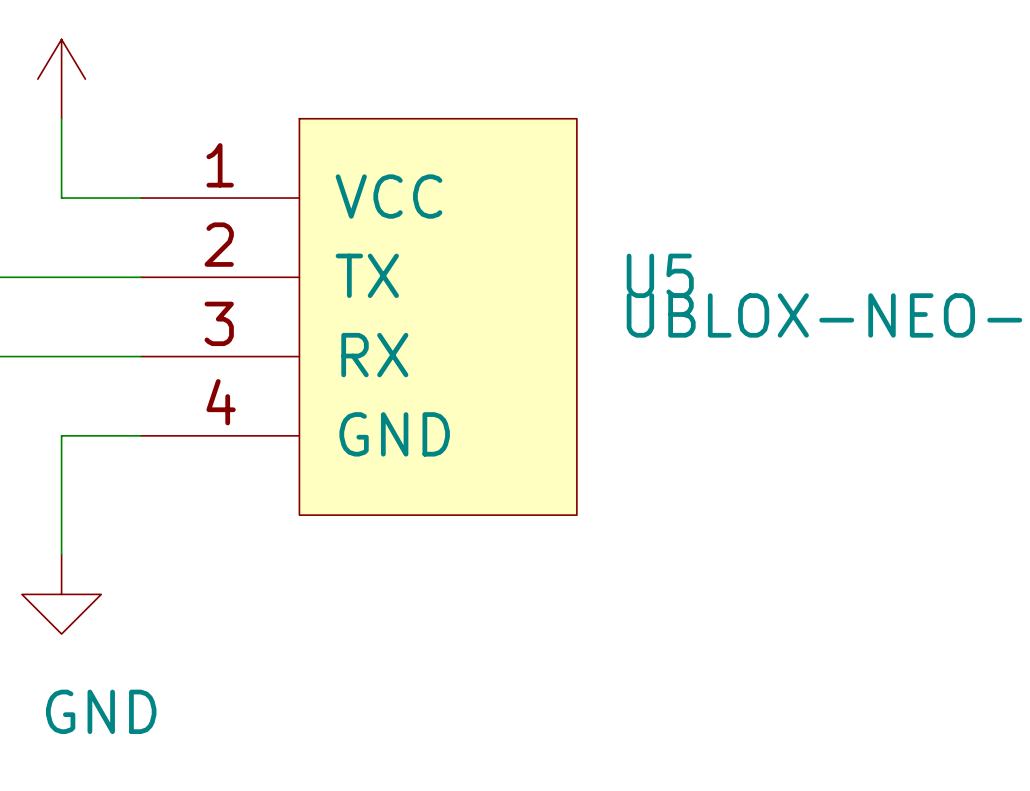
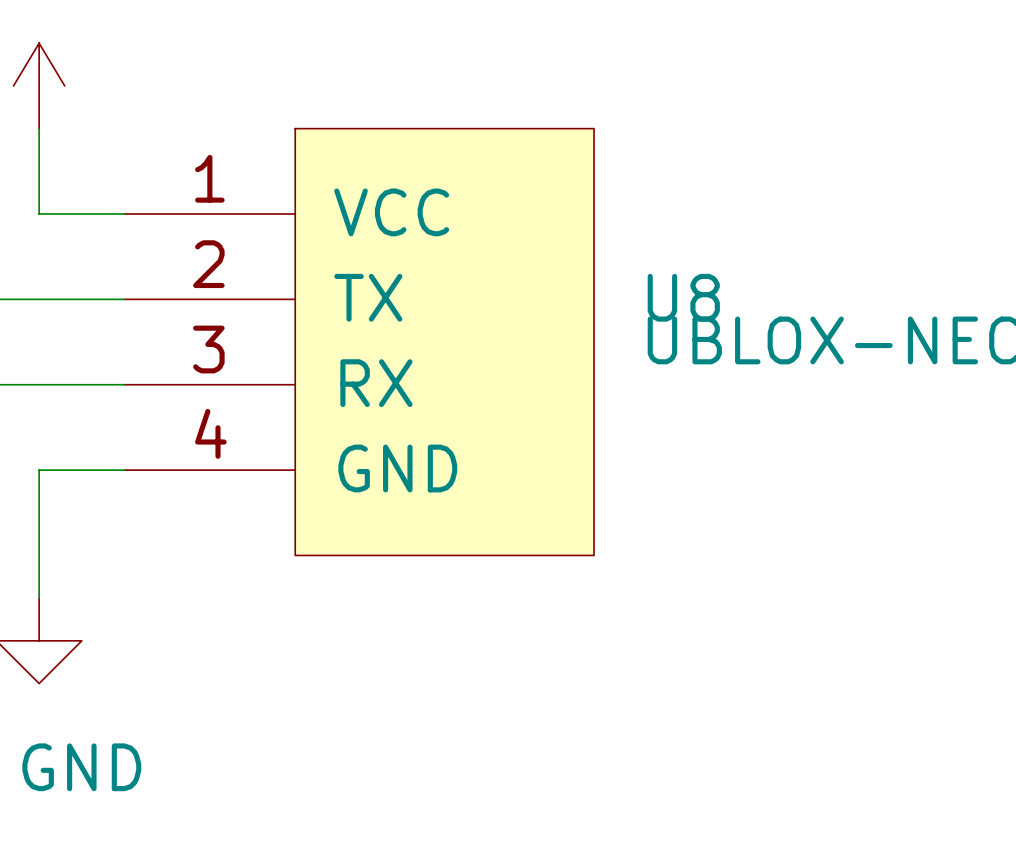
U5 name: U5 (660, 275) -> U8 (683, 297)

